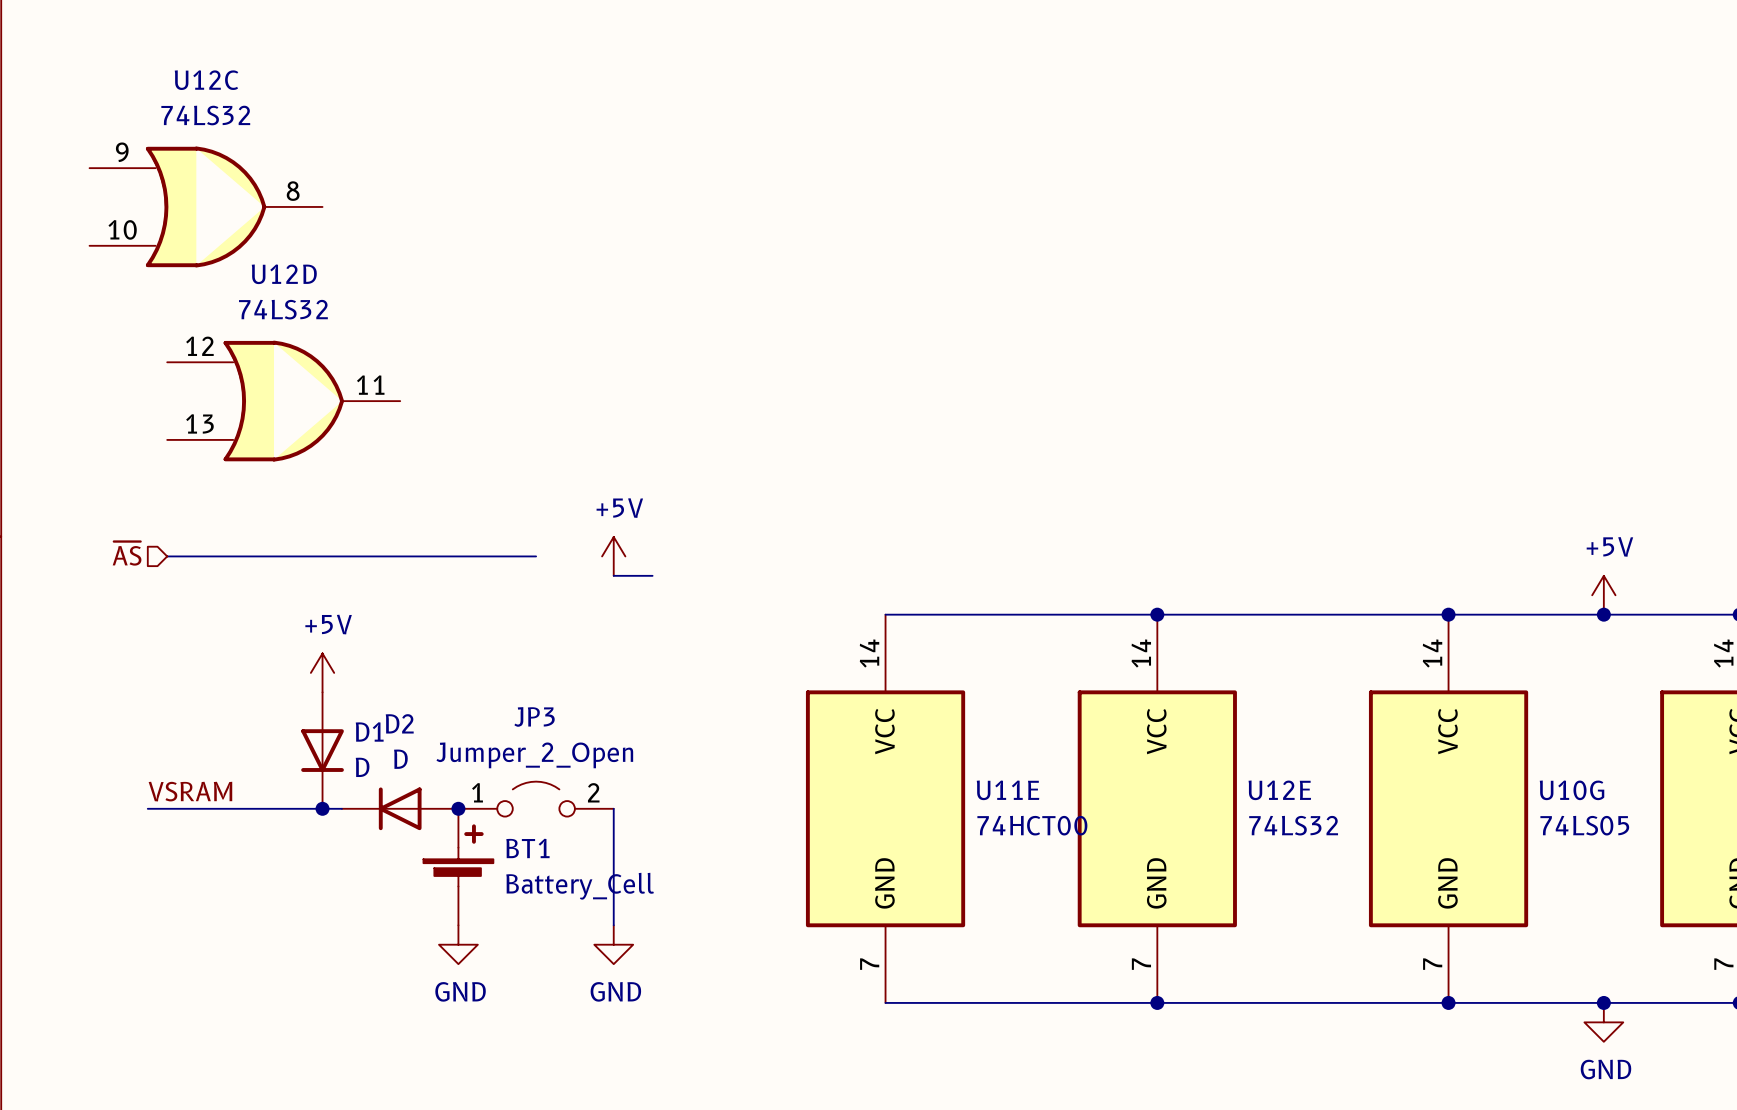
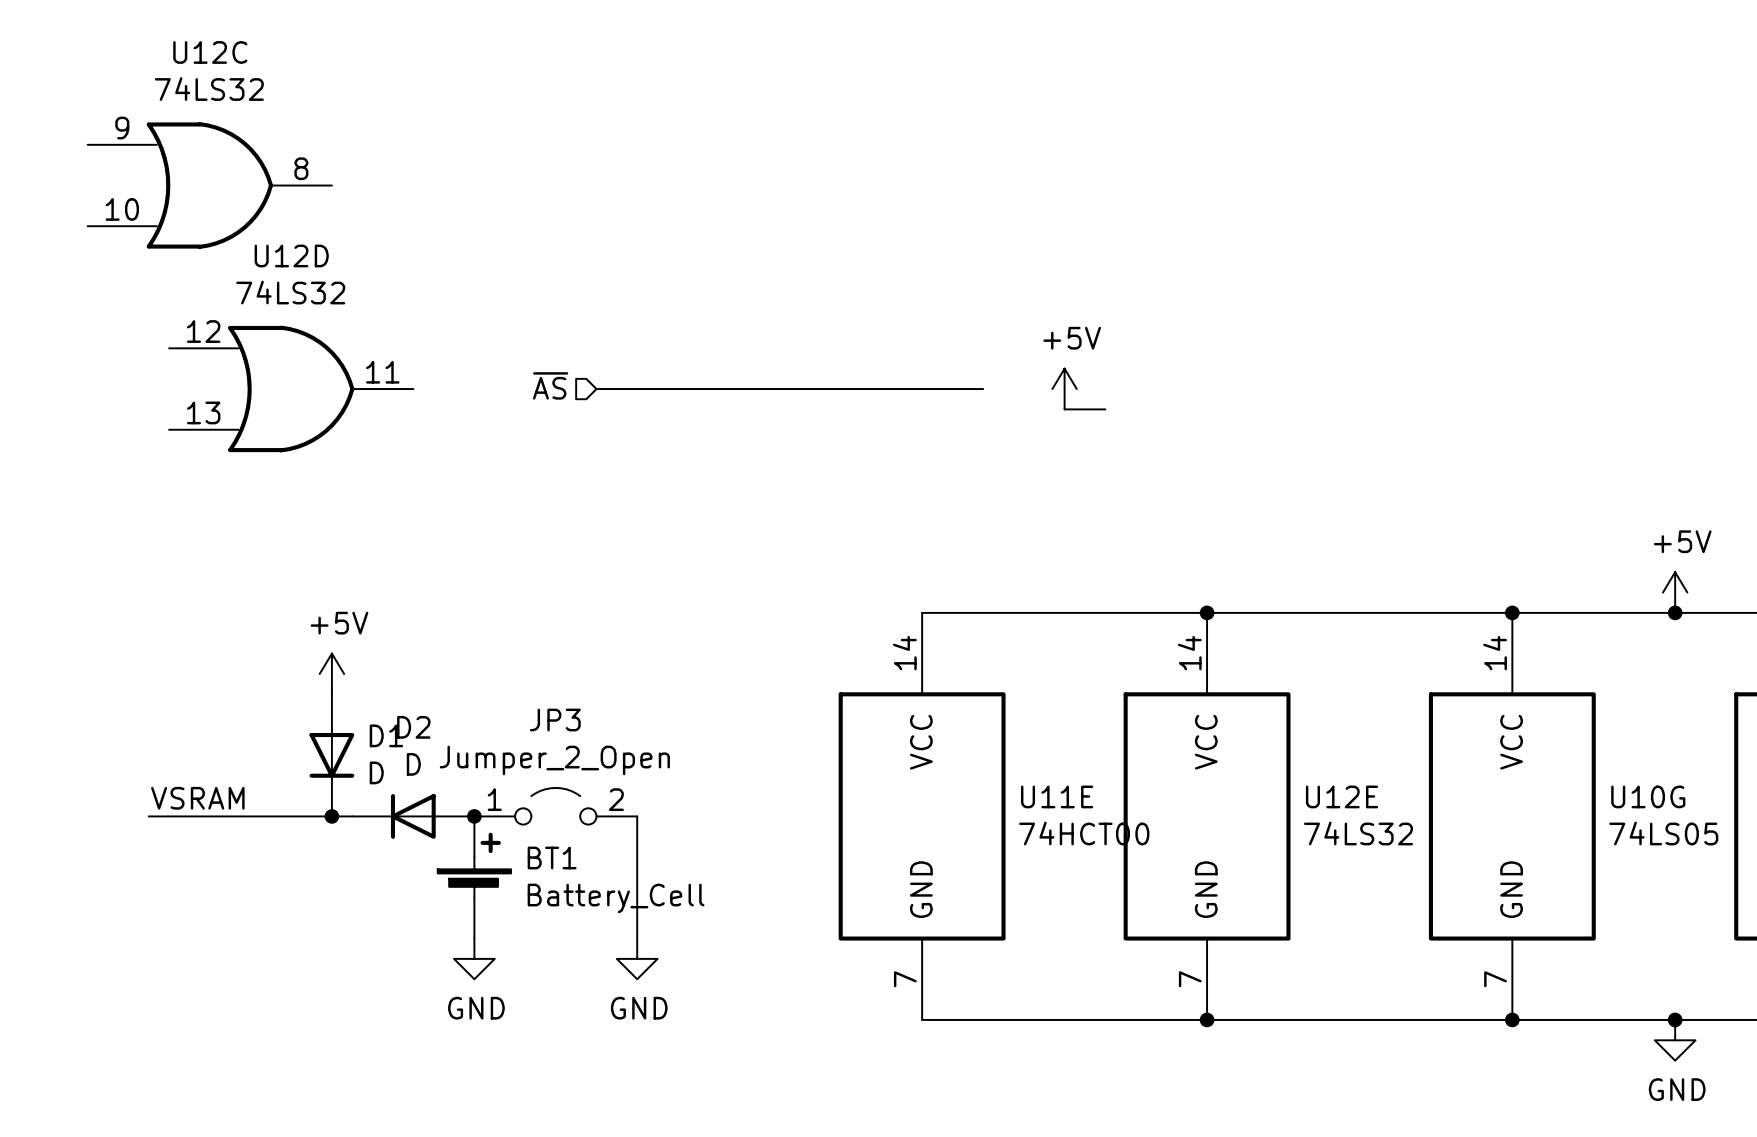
hierarchical label: none -> ~{AS} (550, 385)
wire: none -> (596, 389) (983, 389)
power symbol: none -> +5V (1064, 389)
wire: none -> (1064, 409) (1105, 409)
hierarchical label: ~{AS} (127, 553) -> none
wire: (167, 556) (536, 556) -> none
power symbol: +5V (613, 556) -> none
wire: (613, 575) (652, 575) -> none

